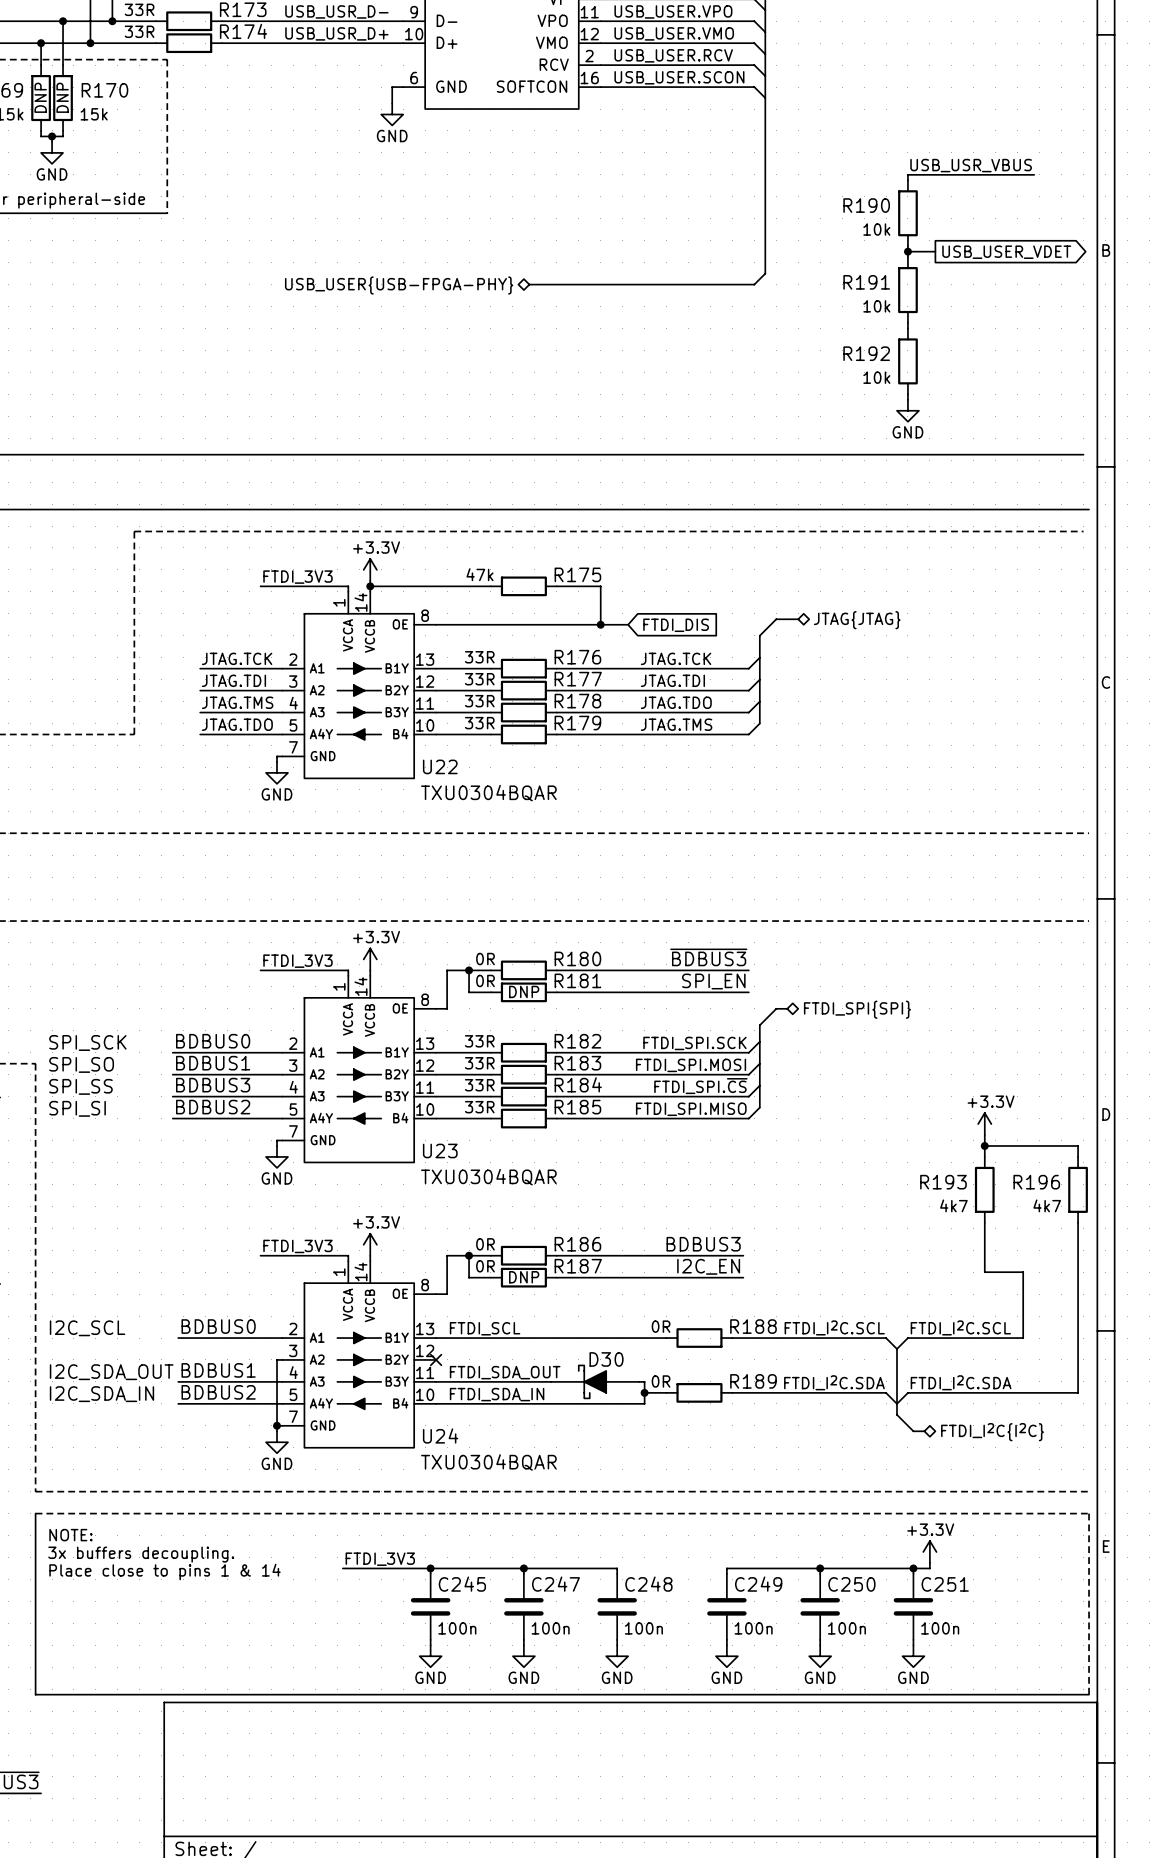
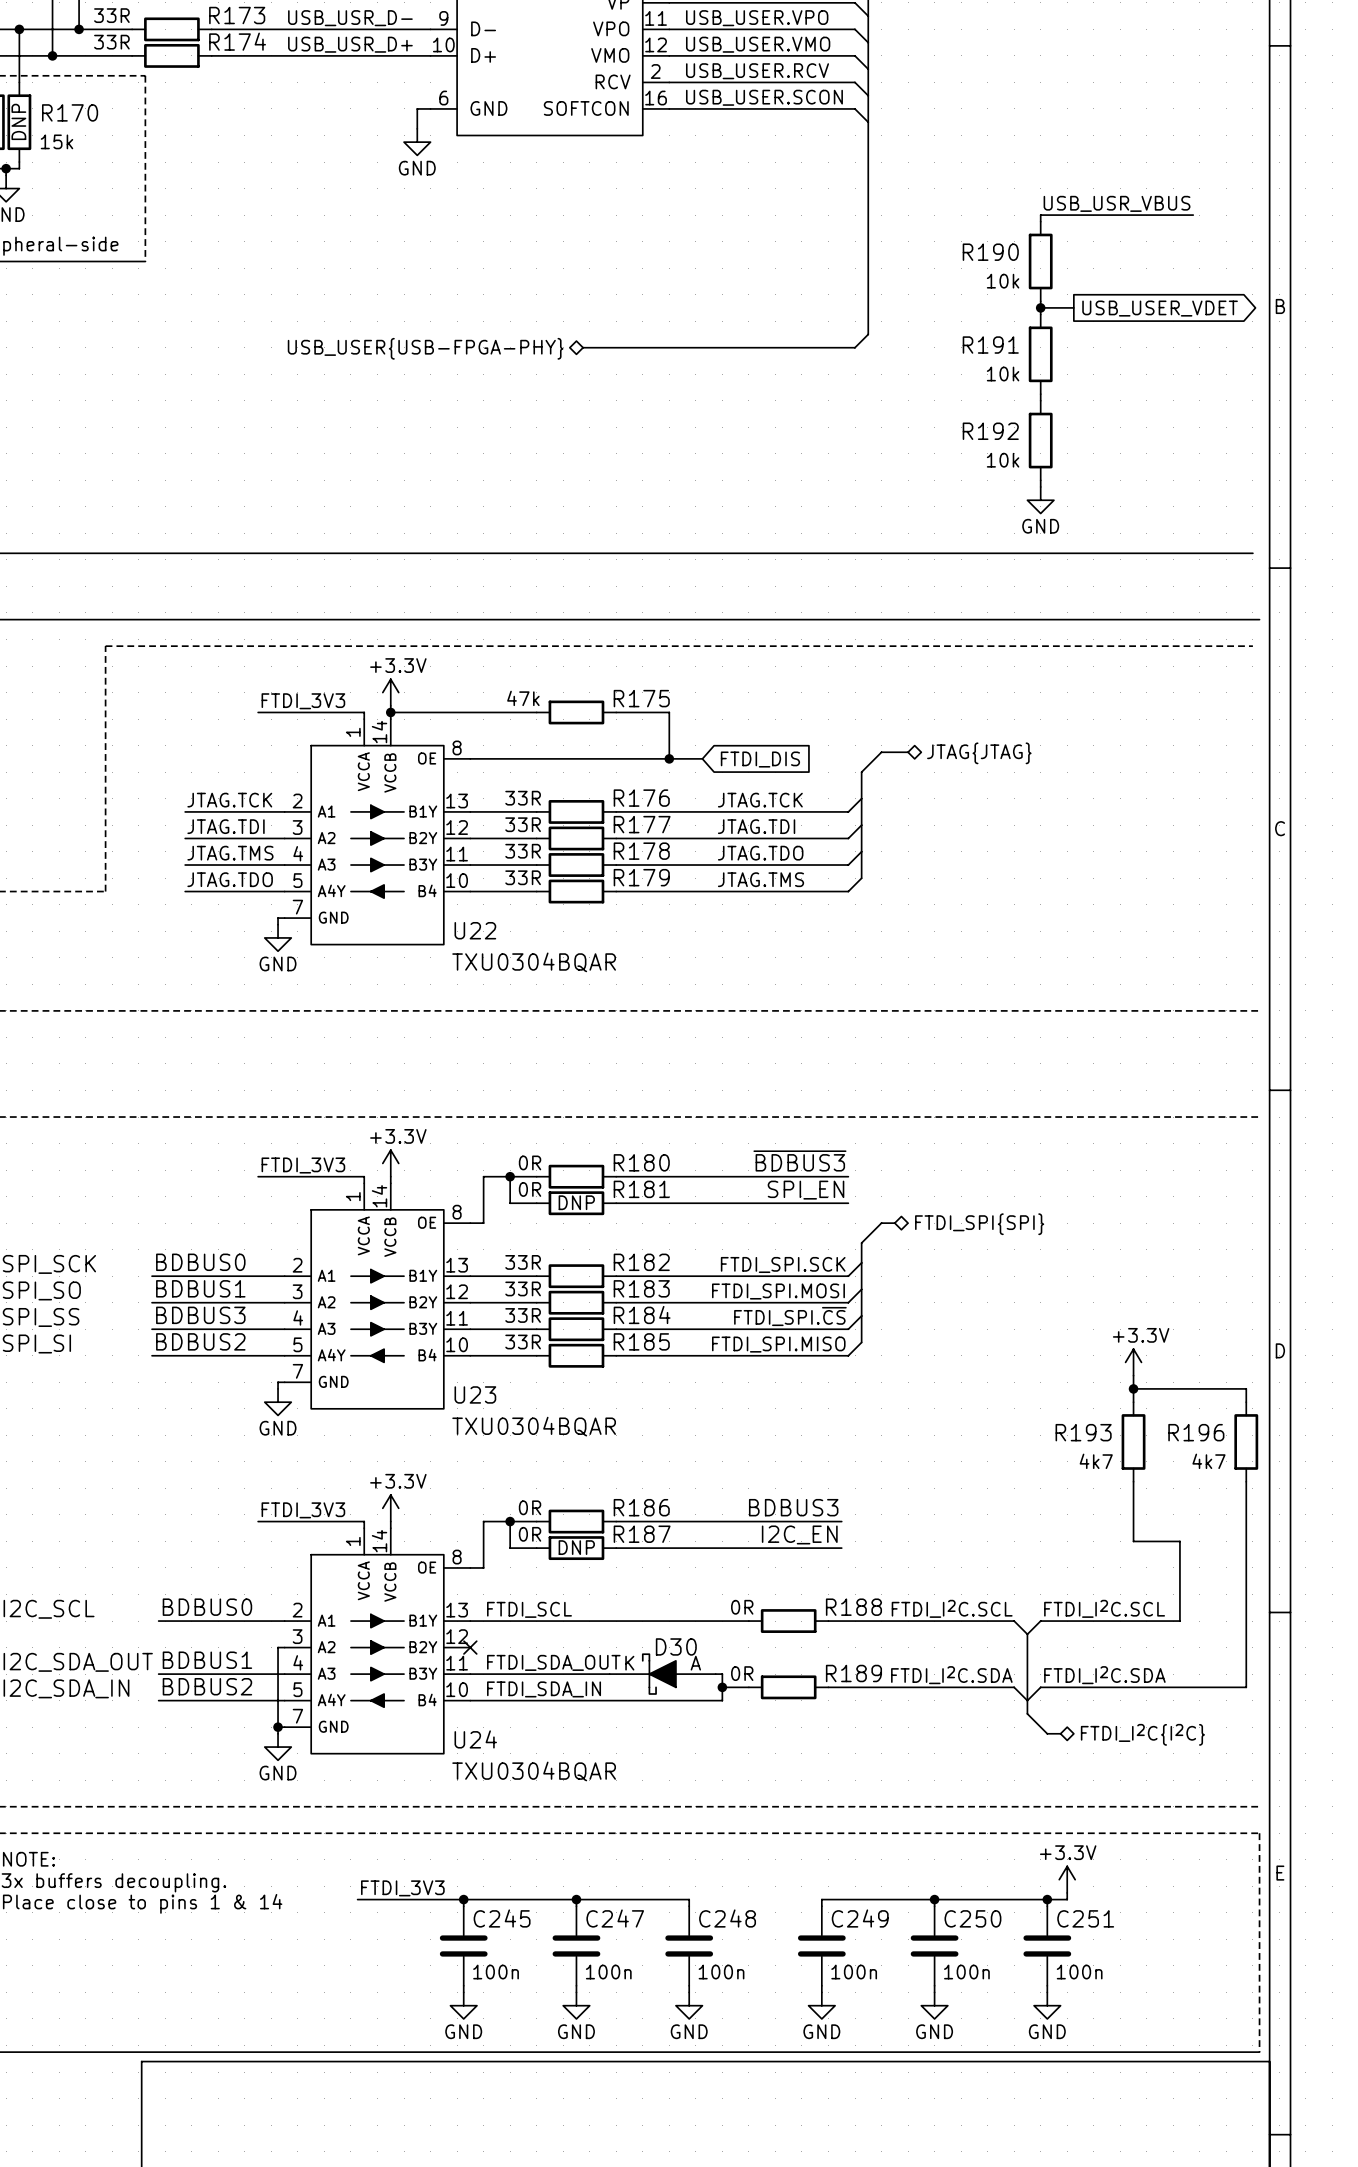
D30 pin number: none -> K (629, 1663)
D30 pin number: none -> A (695, 1663)

